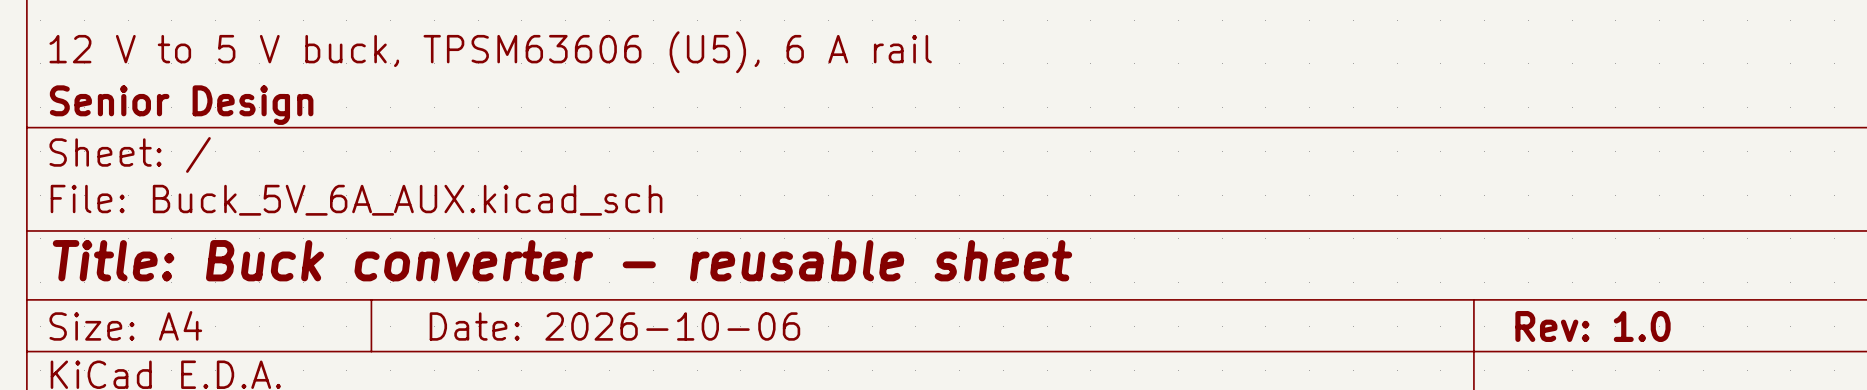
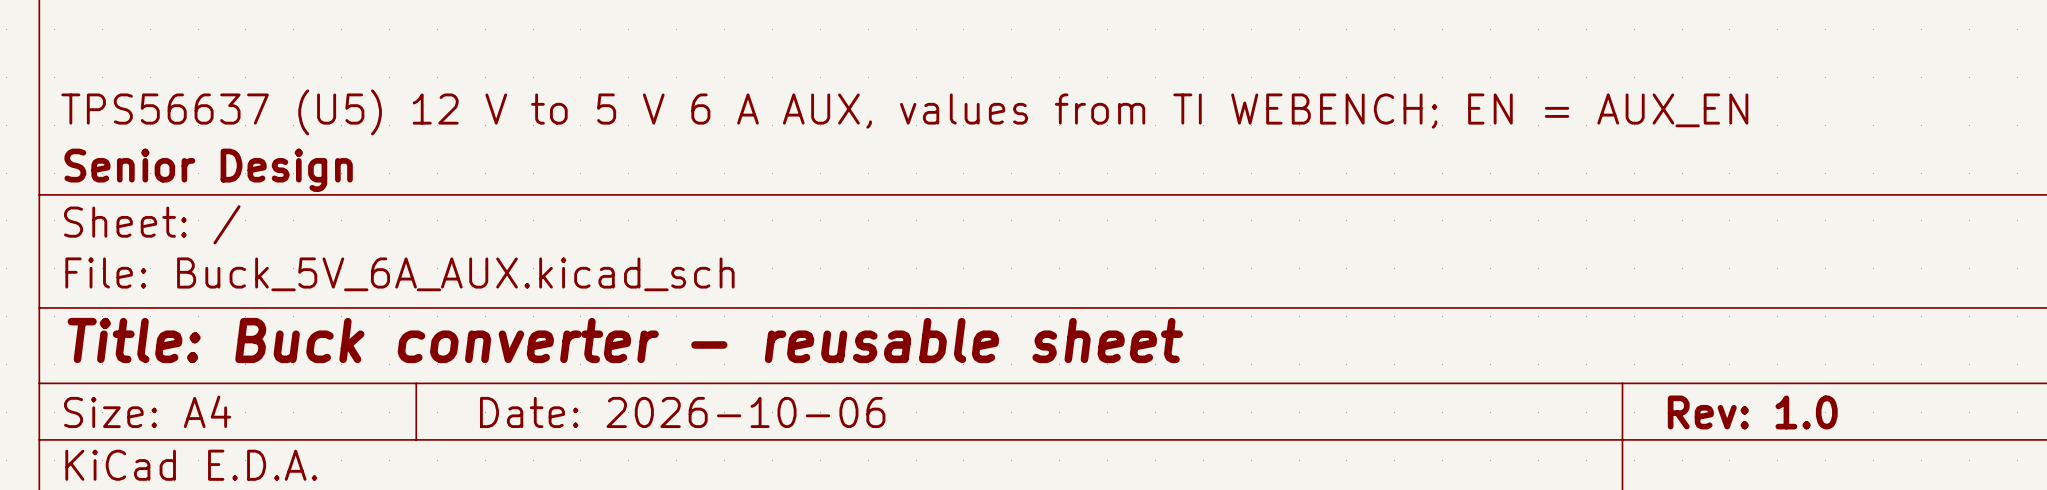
title block: 12 V to 5 V buck, TPSM63606 (U5), 6 A rail (490, 52) -> TPS56637 (U5) 12 V to 5 V 6 A AUX, values from TI WEBENCH; EN = AUX_EN (904, 112)

